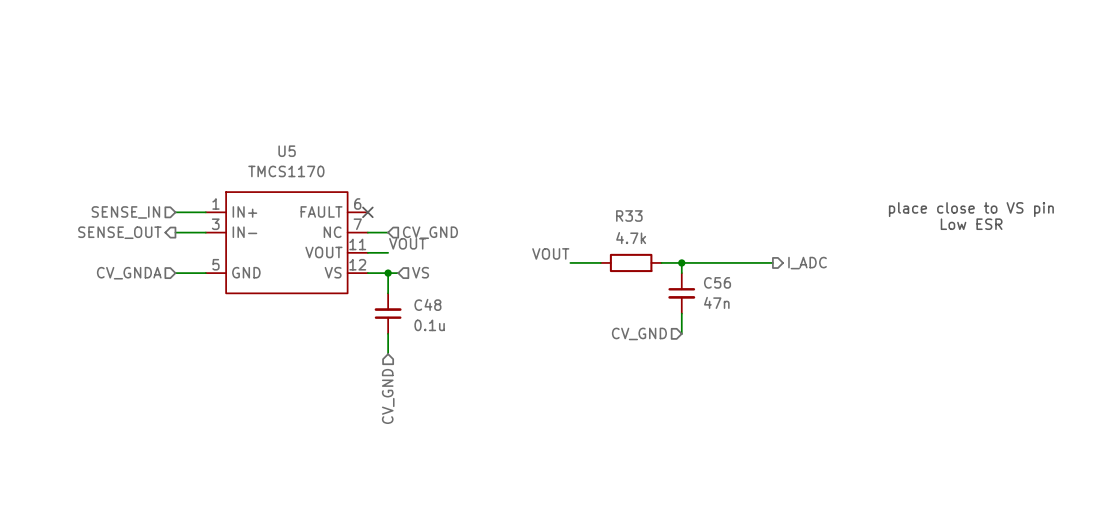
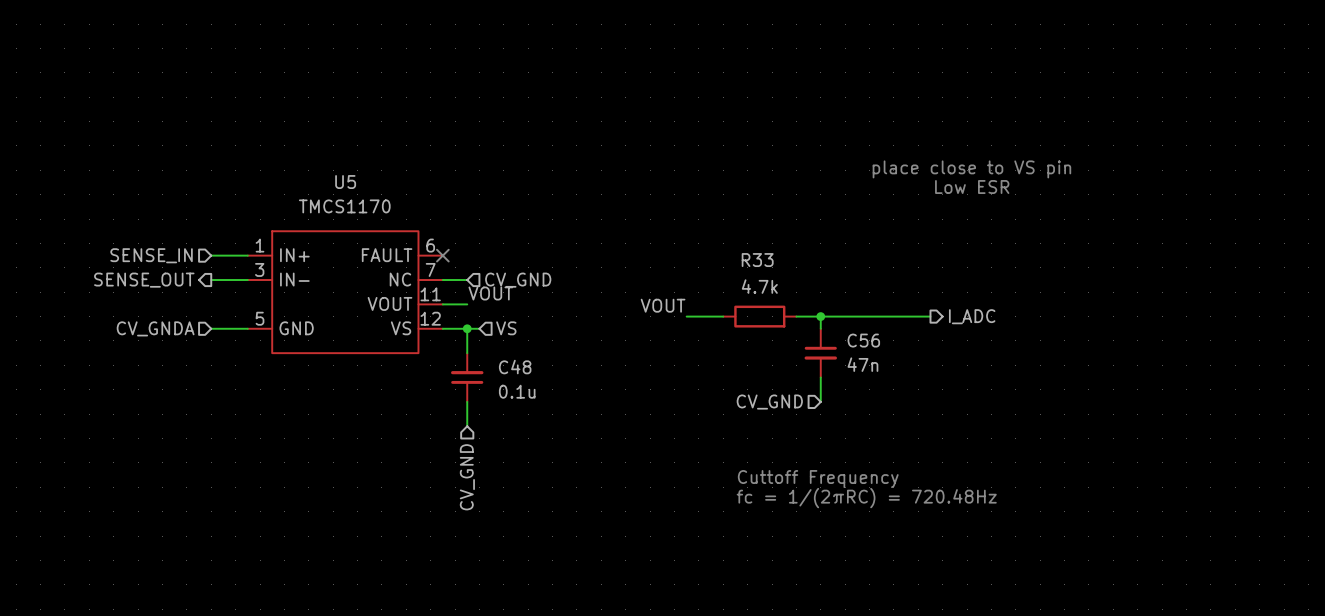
text position: place close to VS pin (971, 209) -> place close to VS pin (971, 169)
text position: Low ESR (971, 224) -> Low ESR (972, 187)
text: none -> Cuttoff Frequency (818, 479)
text: none -> fc = 1/(2πRC) = 720.48Hz (866, 498)

